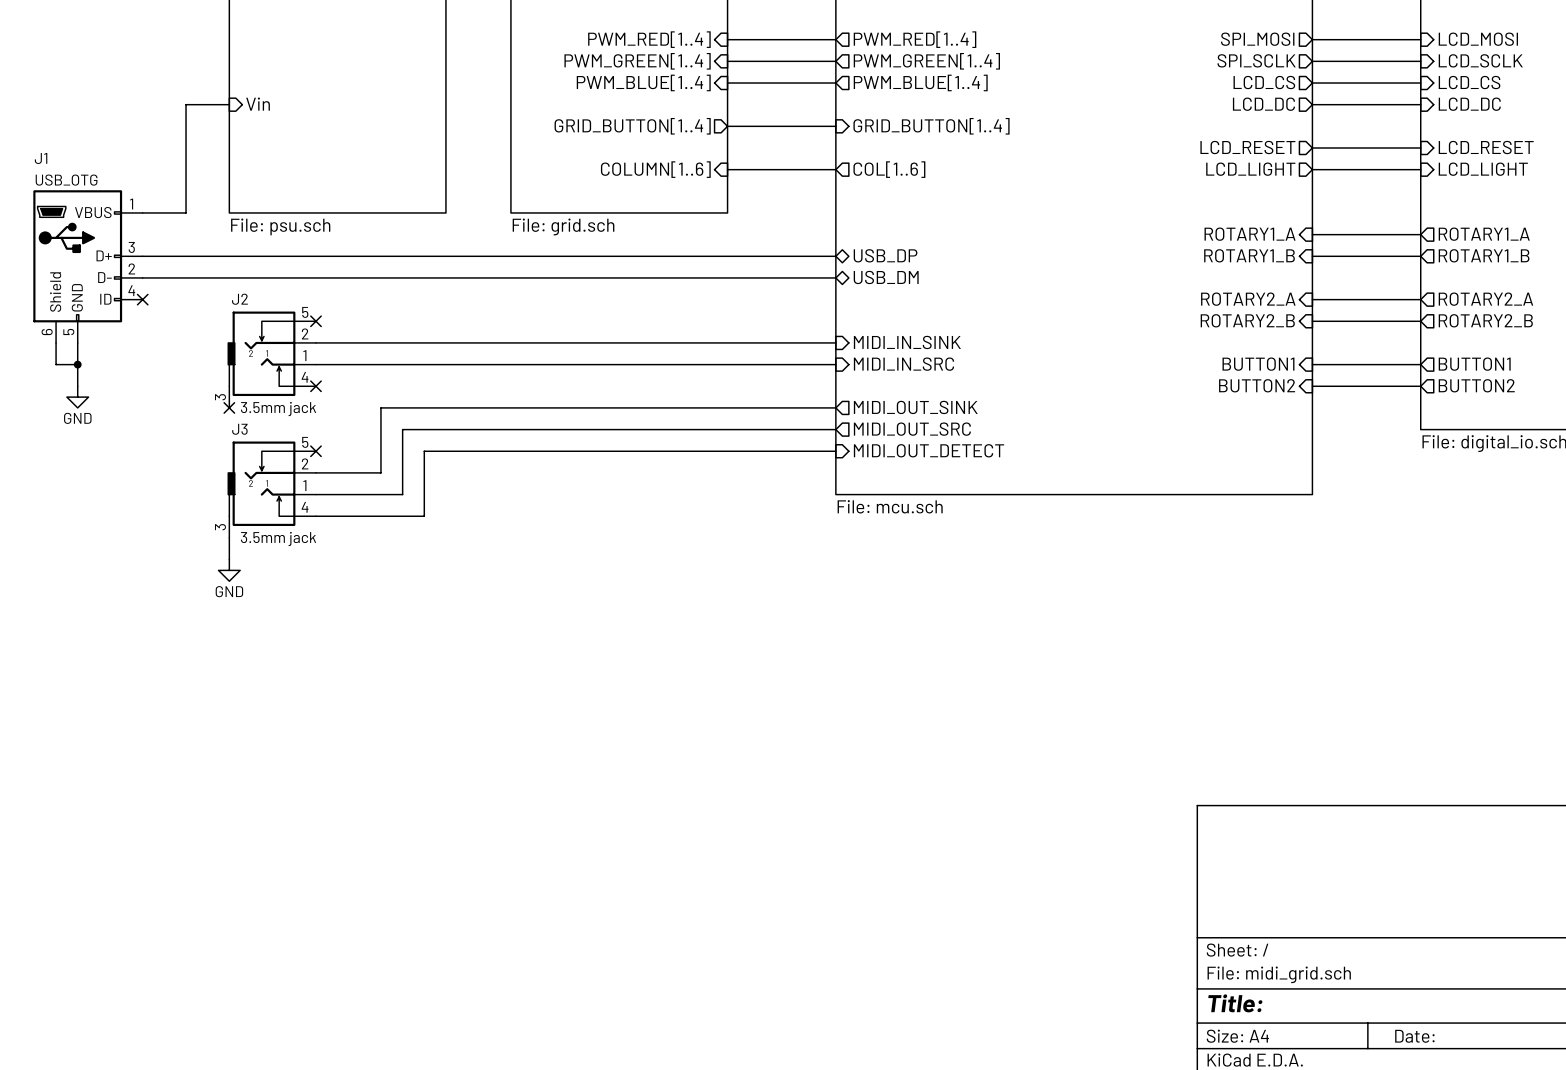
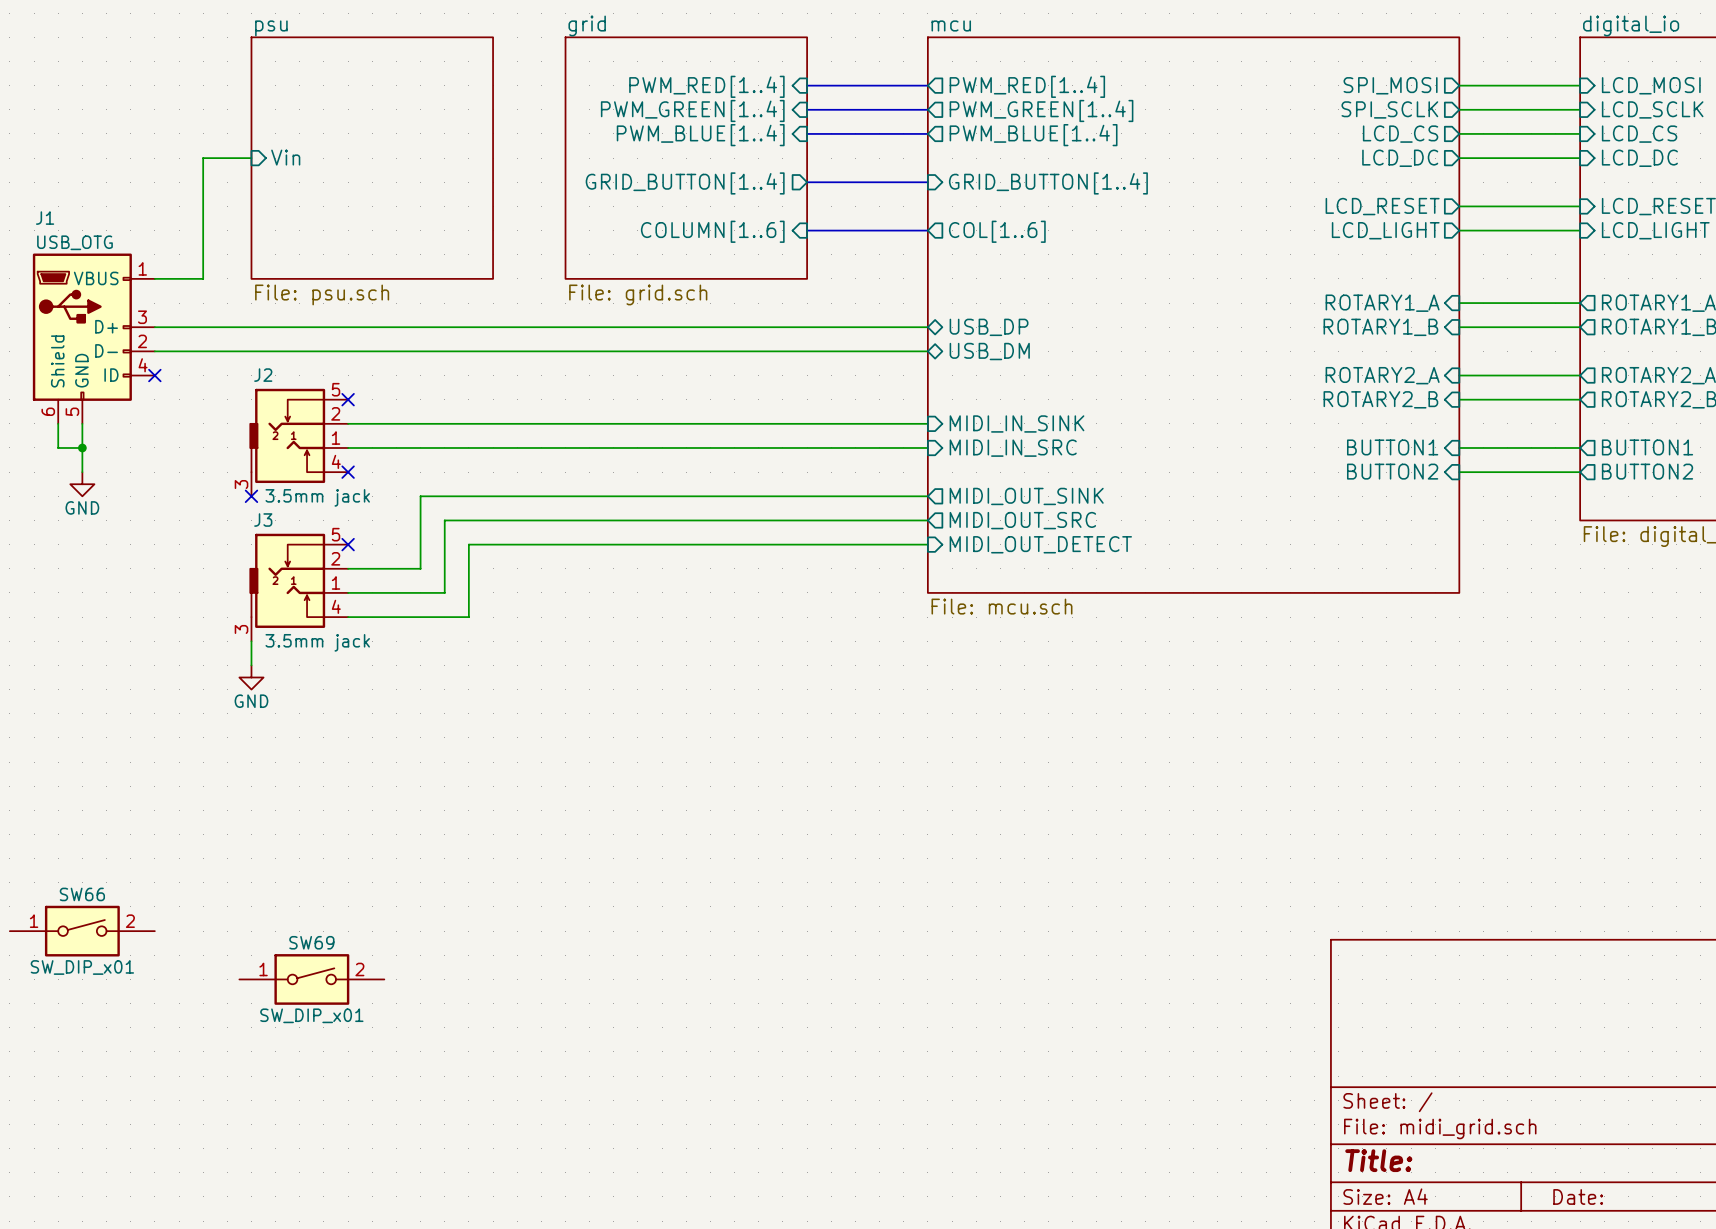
SW66: none -> SW_DIP_x01 (82, 931)
SW69: none -> SW_DIP_x01 (311, 979)

